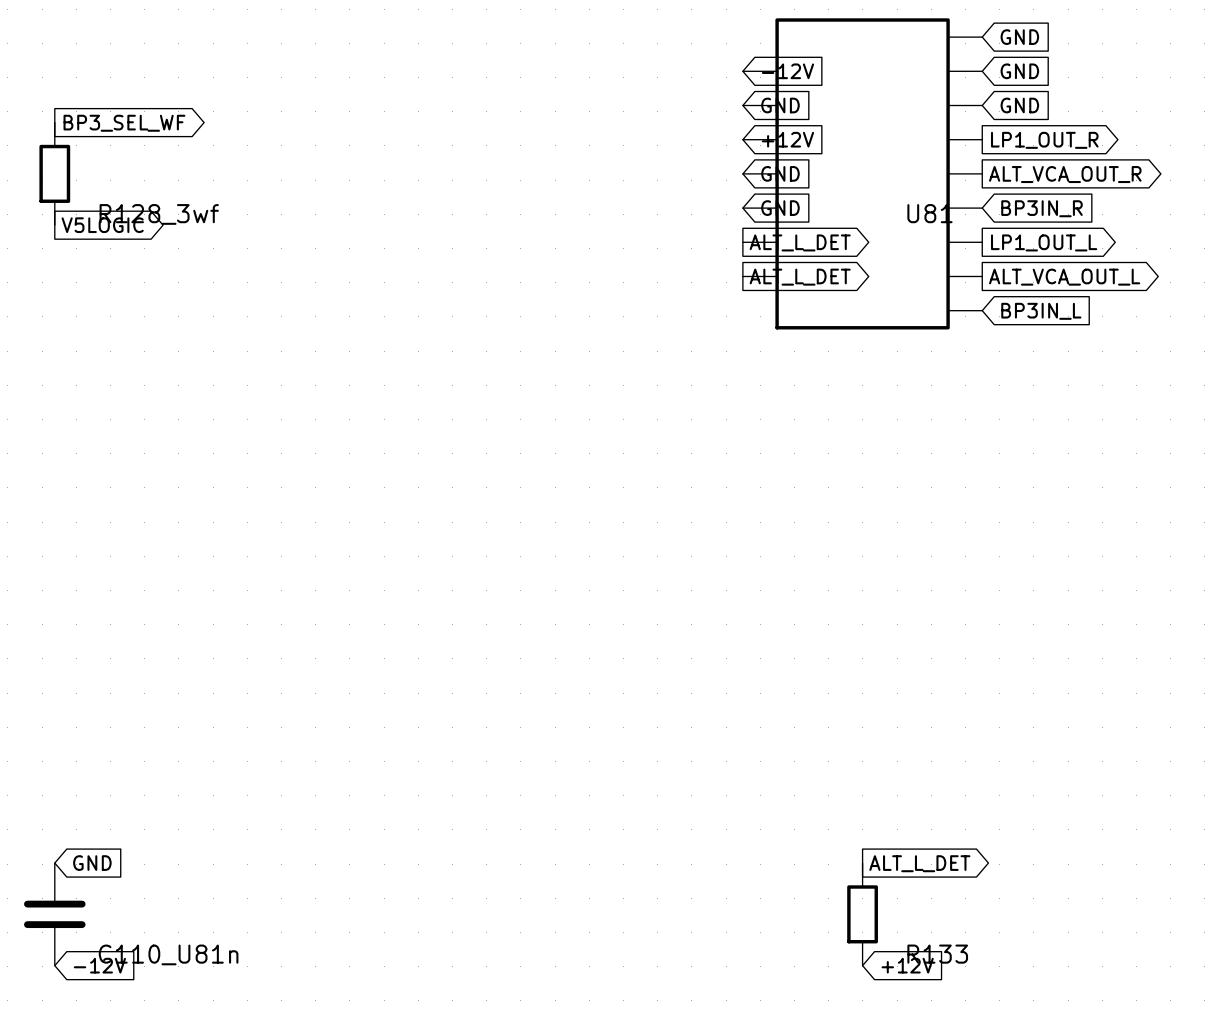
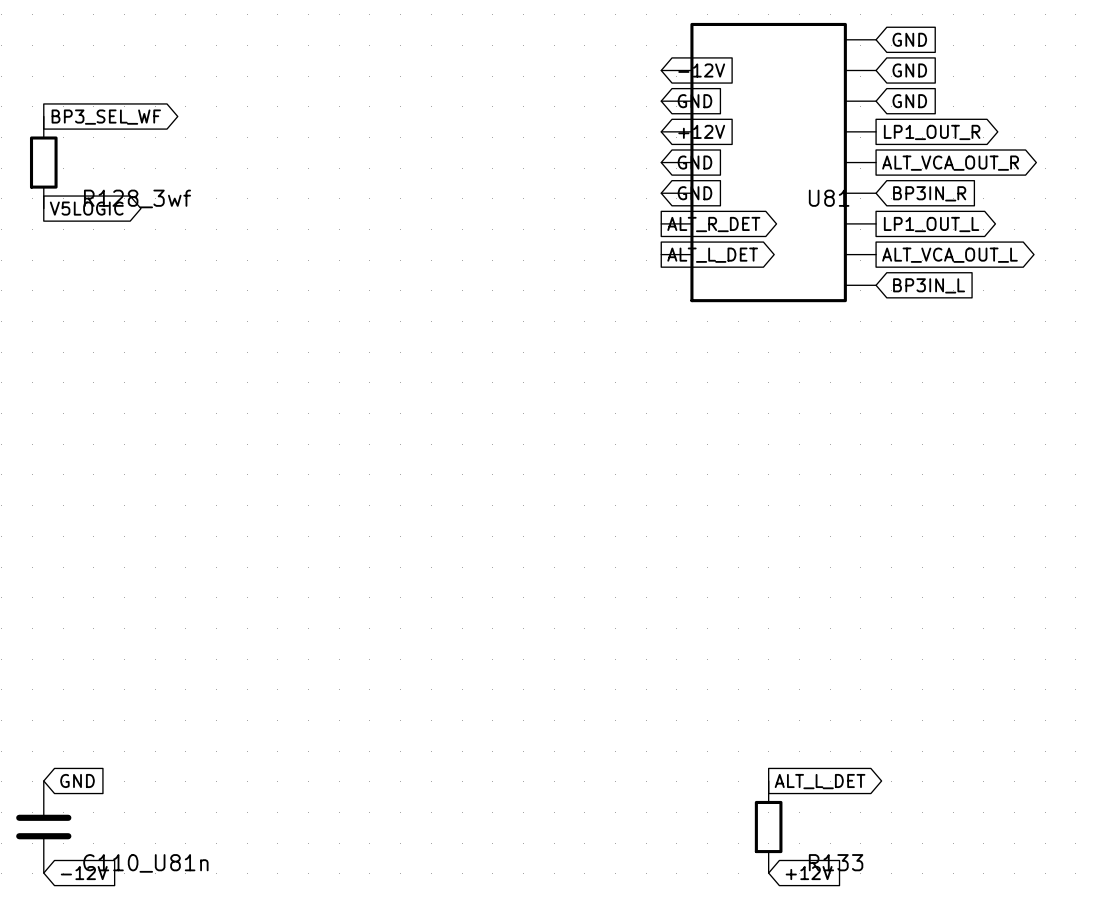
global label: ALT_L_DET (800, 242) -> ALT_R_DET (713, 224)

